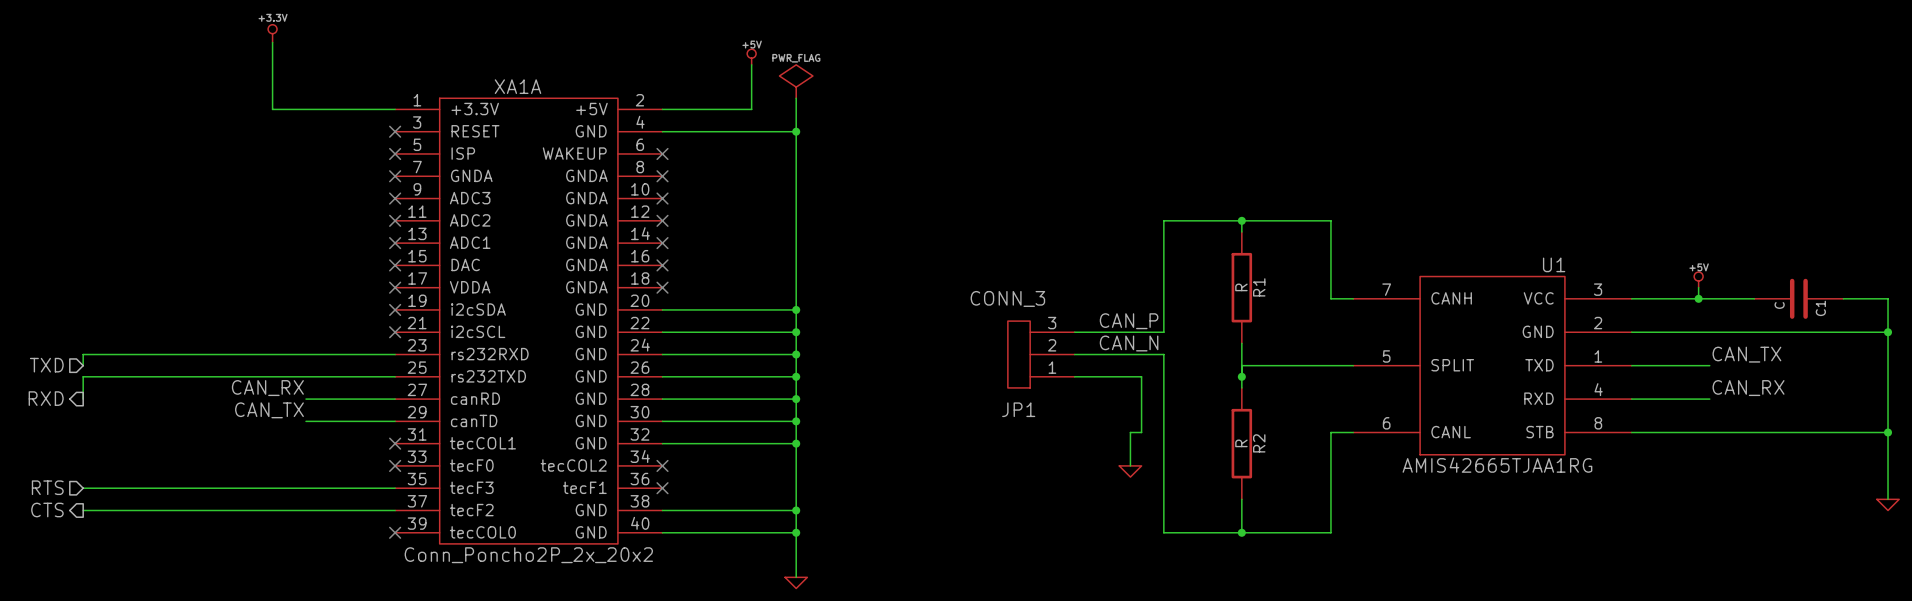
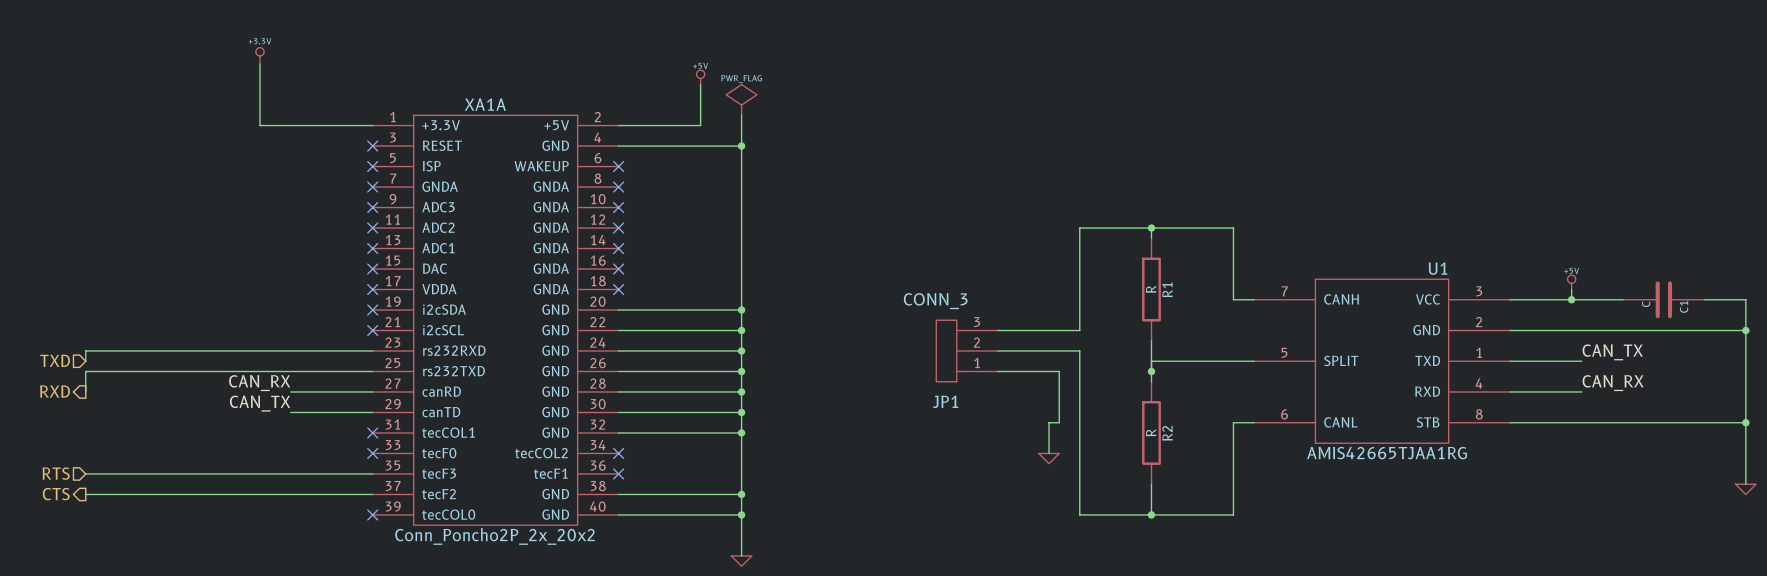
label: CAN_P (1129, 321) -> none
label: CAN_N (1129, 343) -> none

